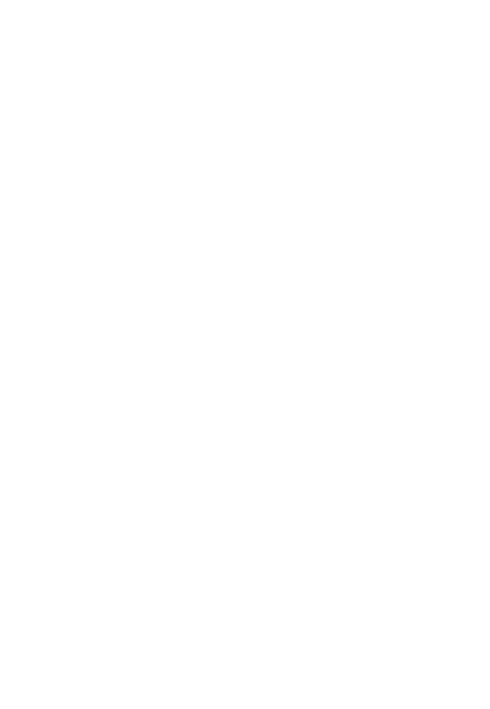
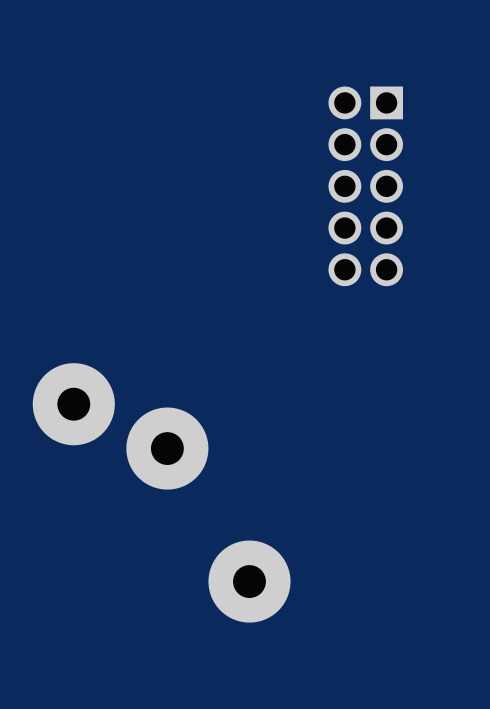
part: none -> (365, 186)
part: none -> (73, 404)
part: none -> (167, 448)
part: none -> (249, 581)

